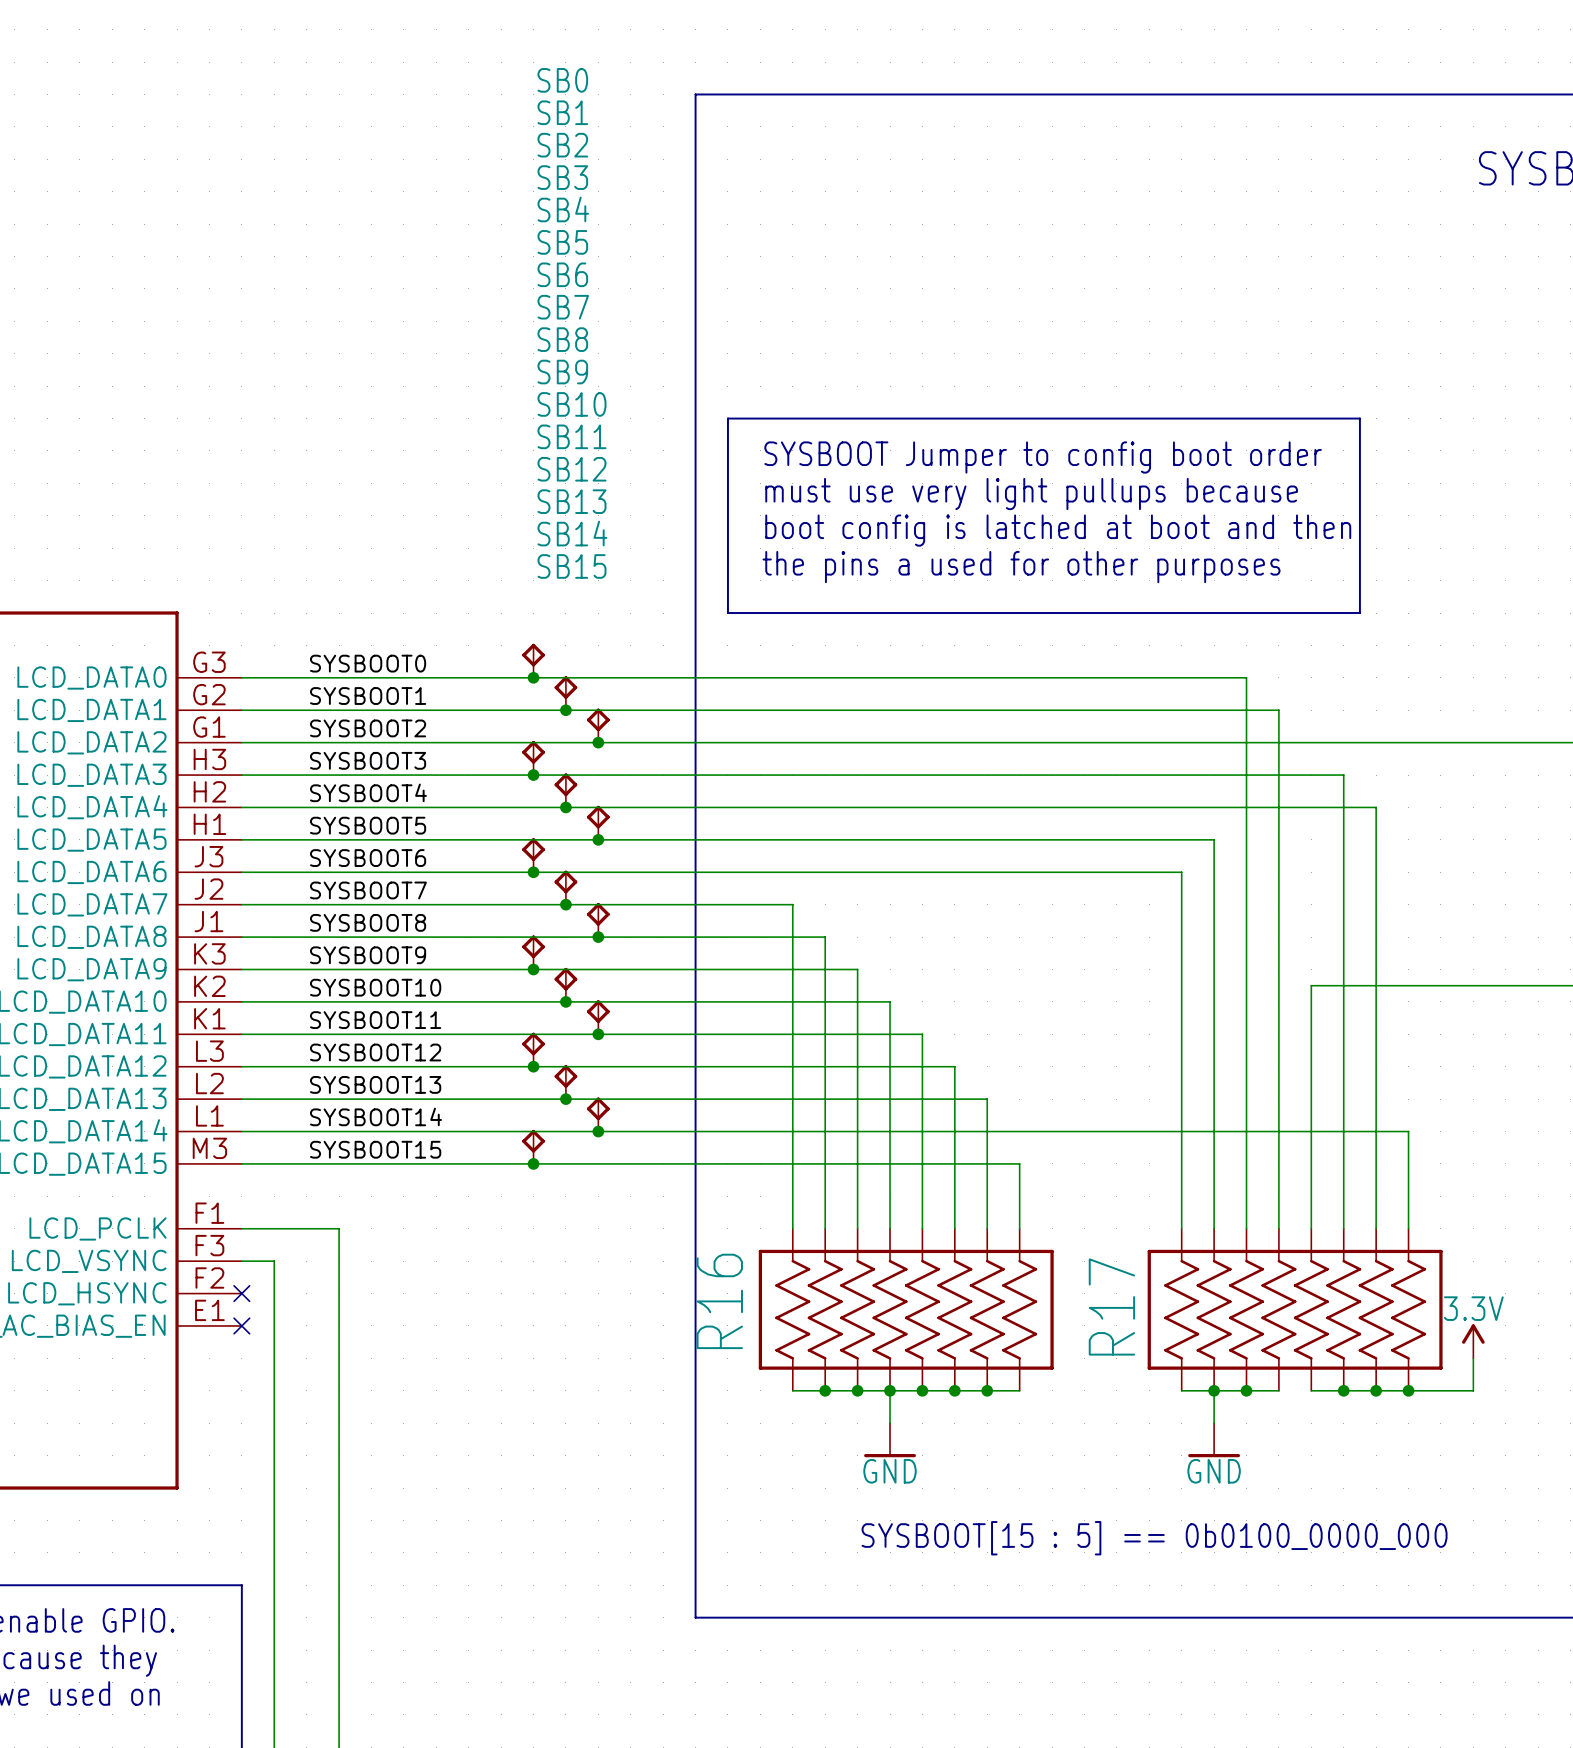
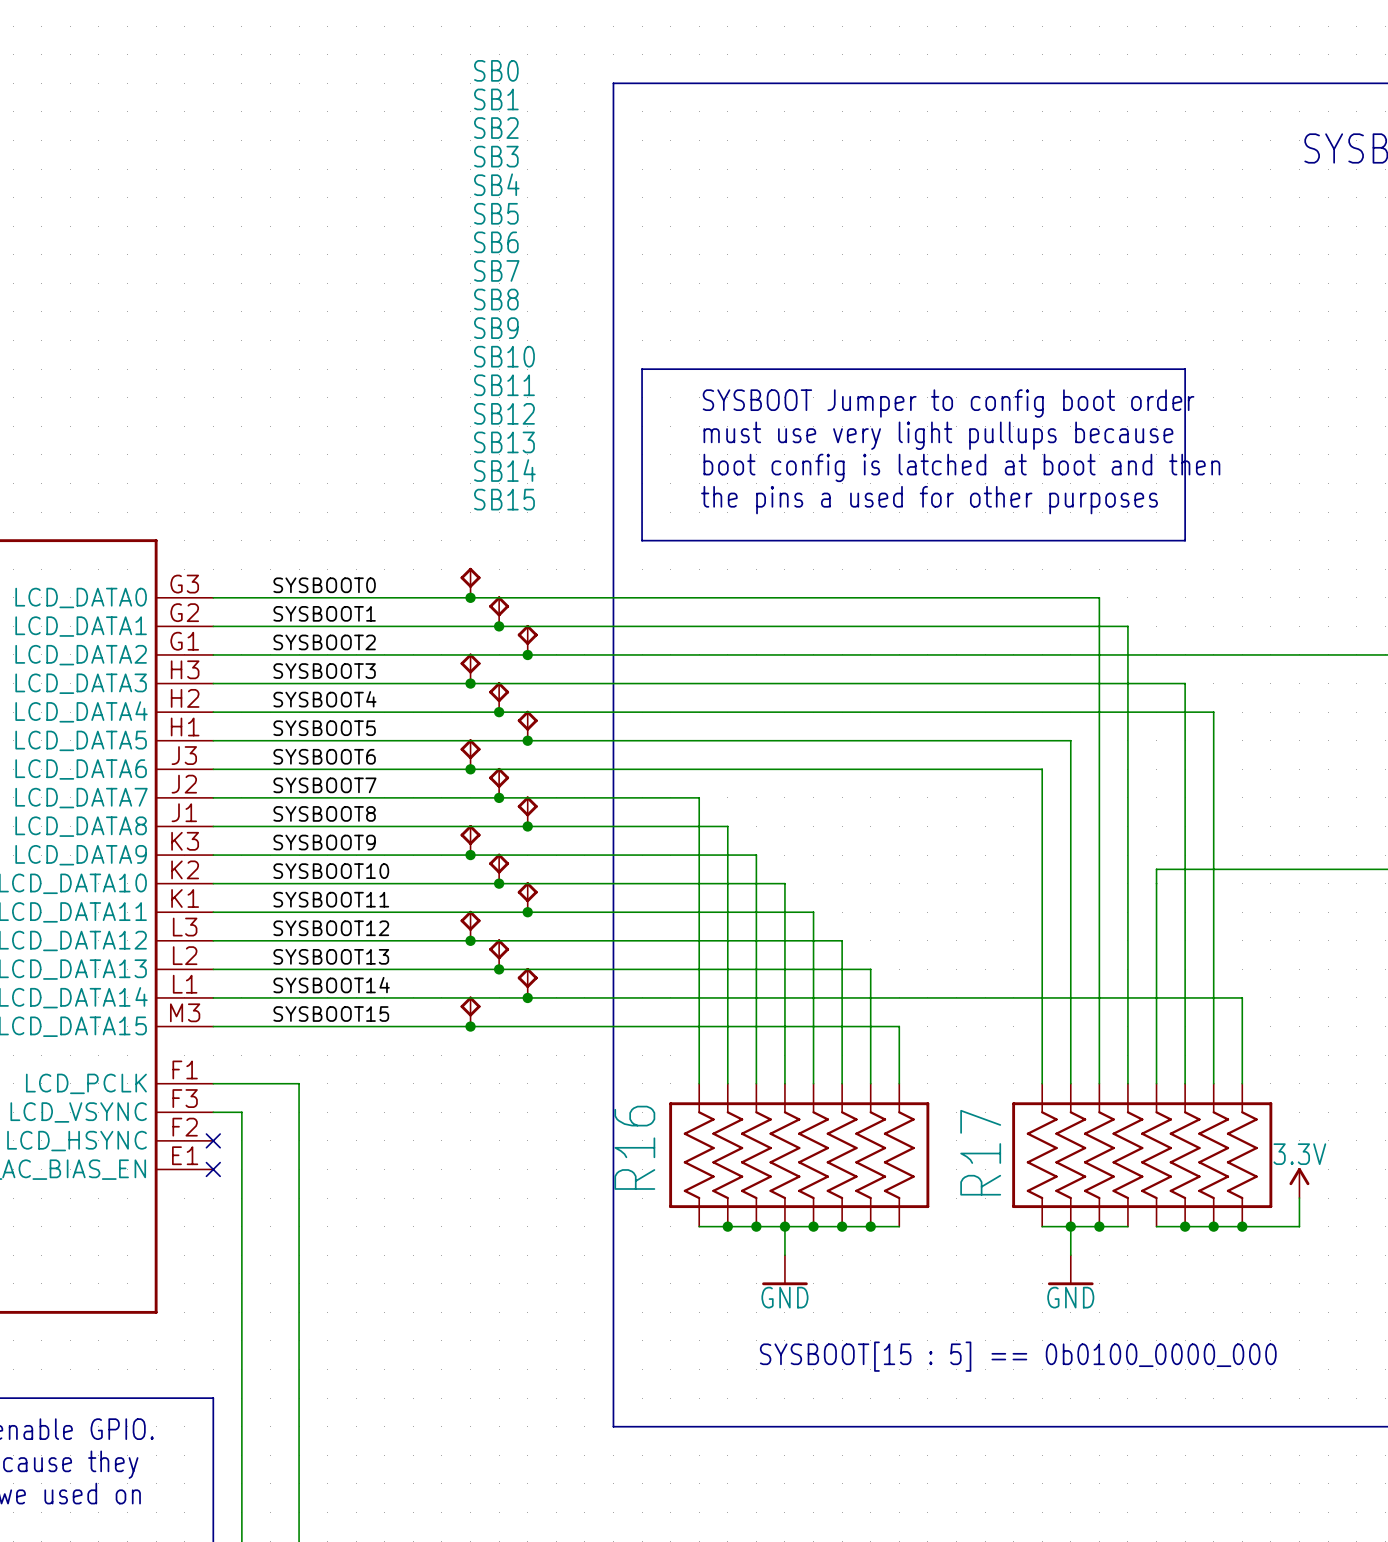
line: (1343, 418) (1359, 418) (1359, 613) (1343, 613) -> (1185, 369) (1185, 540)
text position: SYSBOOT Jumper to config boot order (1043, 457) -> SYSBOOT Jumper to config boot order (948, 403)
text position: must use very light pullups because (1031, 494) -> must use very light pullups because (938, 435)
text position: boot config is latched at boot and then (1058, 530) -> boot config is latched at boot and then (961, 467)
text position: the pins a used for other purposes (1021, 567) -> the pins a used for other purposes (929, 500)

